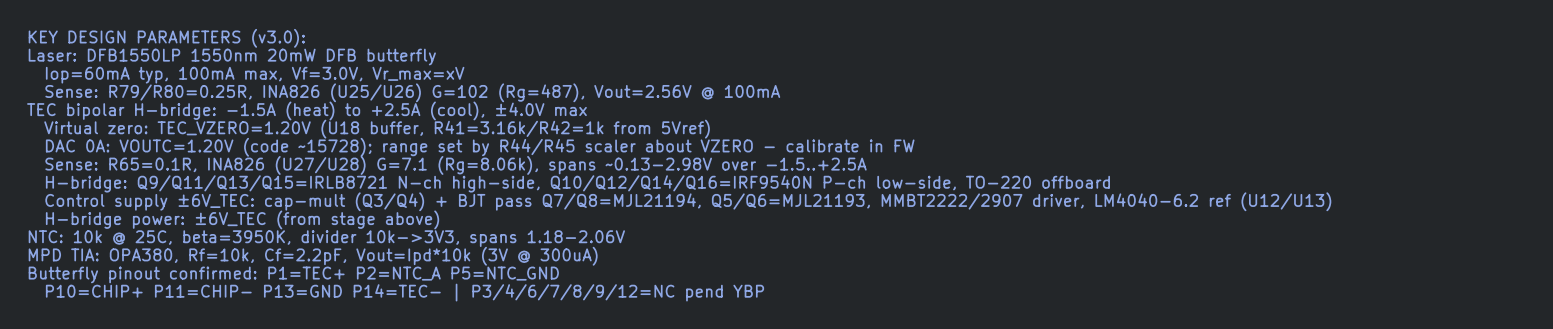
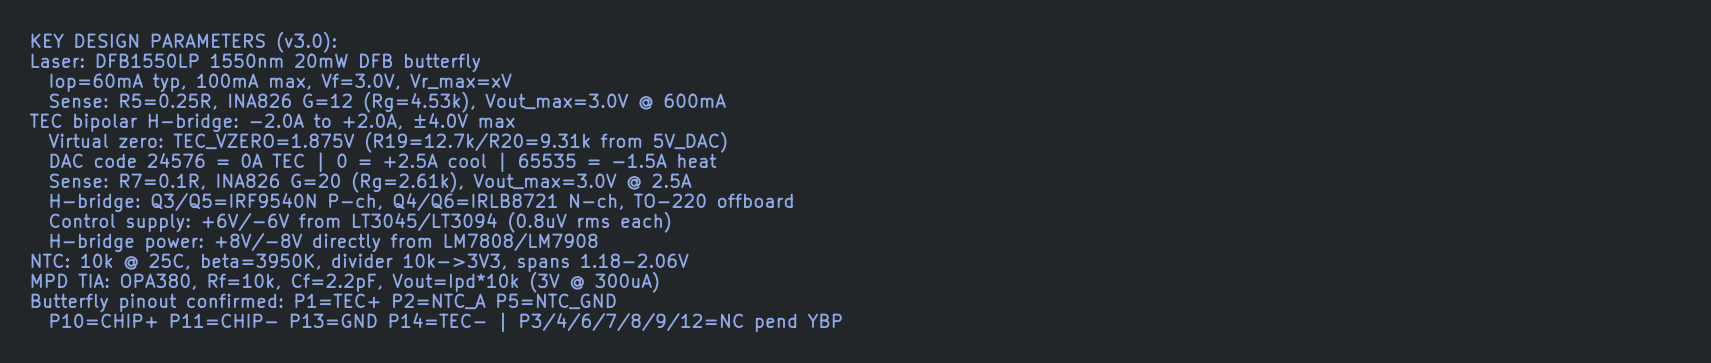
text: Sense: R79/R80=0.25R, INA826 (U25/U26) G=102 (Rg=487), Vout=2.56V @ 100mA (412, 92) -> Sense: R5=0.25R, INA826 G=12 (Rg=4.53k), Vout_max=3.0V @ 600mA (387, 102)
text: TEC bipolar H-bridge: -1.5A (heat) to +2.5A (cool), ±4.0V max (306, 110) -> TEC bipolar H-bridge: -2.0A to +2.0A, ±4.0V max (272, 122)
text: Virtual zero: TEC_VZERO=1.20V (U18 buffer, R41=3.16k/R42=1k from 5Vref) (377, 129) -> Virtual zero: TEC_VZERO=1.875V (R19=12.7k/R20=9.31k from 5V_DAC) (387, 142)
text: DAC 0A: VOUTC=1.20V (code ~15728); range set by R44/R45 scaler about VZERO - calibrate in FW (480, 147) -> DAC code 24576 = 0A TEC | 0 = +2.5A cool | 65535 = -1.5A heat (383, 162)
text: Sense: R65=0.1R, INA826 (U27/U28) G=7.1 (Rg=8.06k), spans ~0.13-2.98V over -1.5..+2.5A (456, 165) -> Sense: R7=0.1R, INA826 G=20 (Rg=2.61k), Vout_max=3.0V @ 2.5A (370, 182)
text: H-bridge: Q9/Q11/Q13/Q15=IRLB8721 N-ch high-side, Q10/Q12/Q14/Q16=IRF9540N P-ch low-side, TO-220 offboard (577, 183) -> H-bridge: Q3/Q5=IRF9540N P-ch, Q4/Q6=IRLB8721 N-ch, TO-220 offboard (421, 202)
text: Control supply ±6V_TEC: cap-mult (Q3/Q4) + BJT pass Q7/Q8=MJL21194, Q5/Q6=MJL21193, MMBT2222/2907 driver, LM4040-6.2 ref (U12/U13) (688, 201) -> Control supply: +6V/-6V from LT3045/LT3094 (0.8uV rms each) (360, 222)
text: H-bridge power: ±6V_TEC (from stage above) (242, 219) -> H-bridge power: +8V/-8V directly from LM7808/LM7908 (323, 242)

